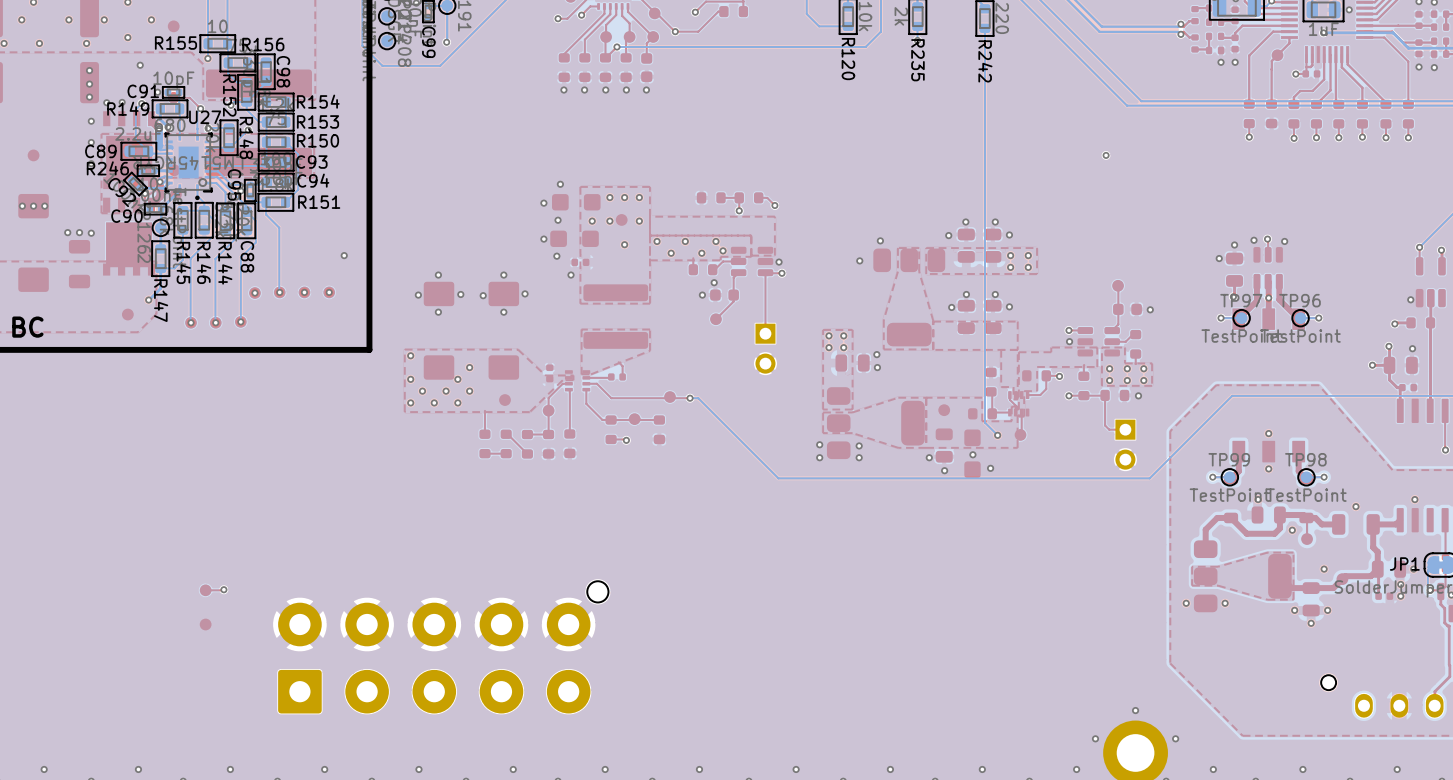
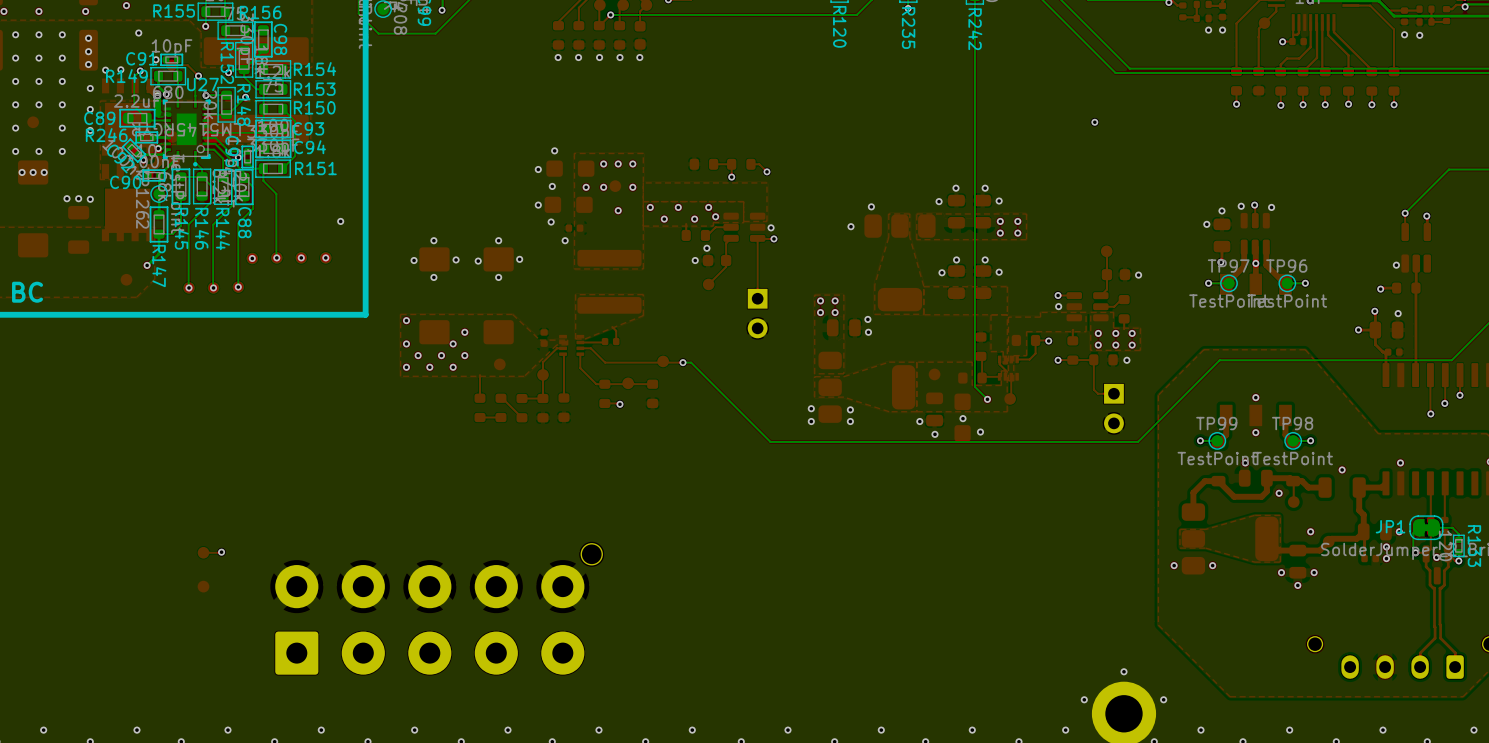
via: none -> (15, 34)
via: none -> (38, 34)
via: none -> (62, 34)
via: none -> (15, 58)
via: none -> (38, 58)
via: none -> (62, 58)
via: none -> (15, 81)
via: none -> (38, 81)
via: none -> (62, 81)
via: none -> (15, 104)
via: none -> (38, 104)
via: none -> (62, 104)
via: none -> (15, 128)
via: none -> (62, 128)
via: none -> (15, 151)
via: none -> (38, 151)
via: none -> (62, 151)

